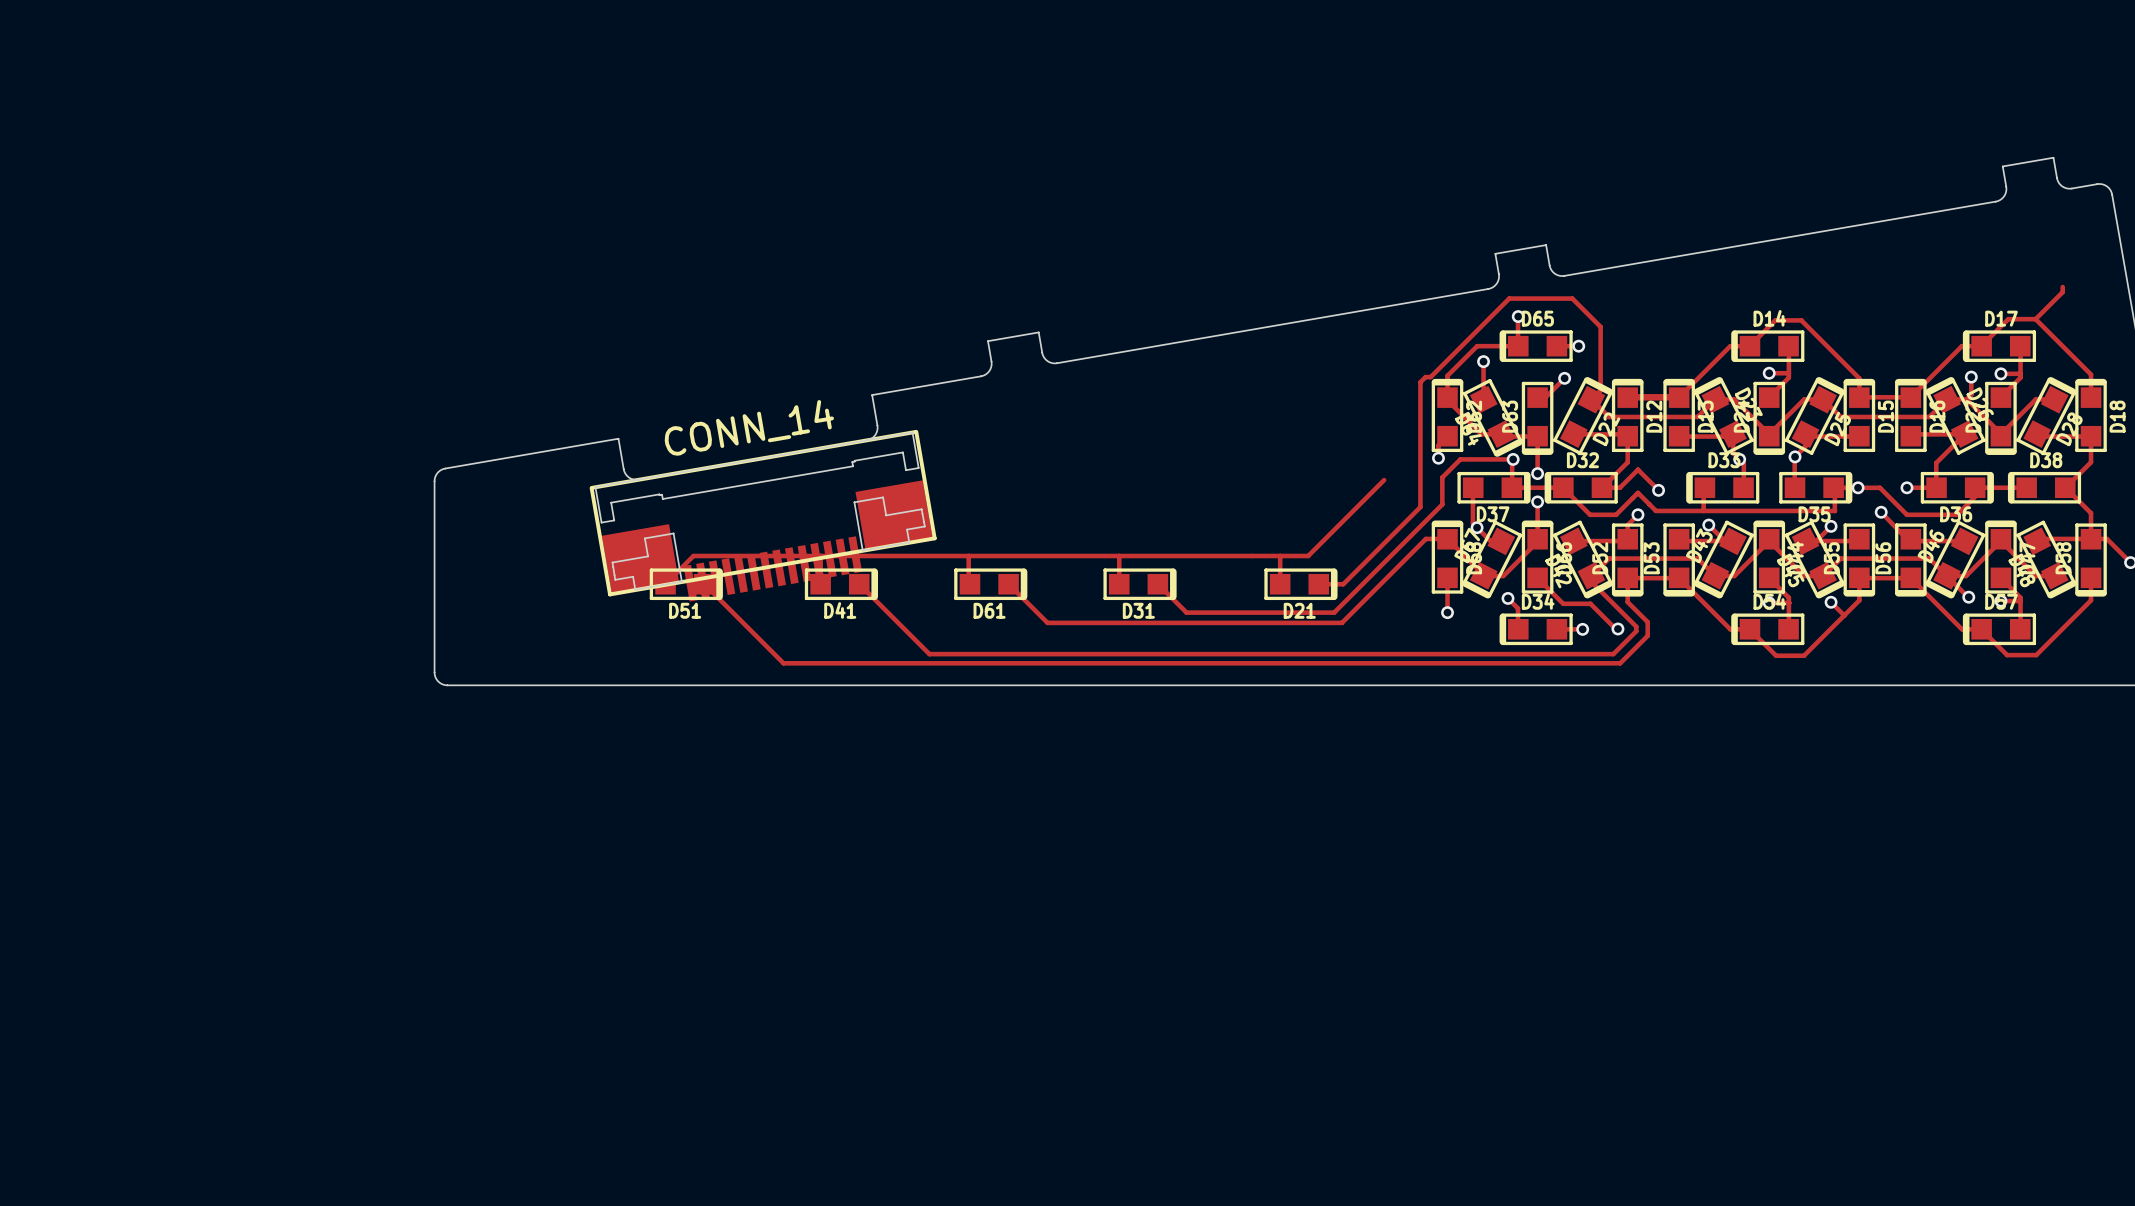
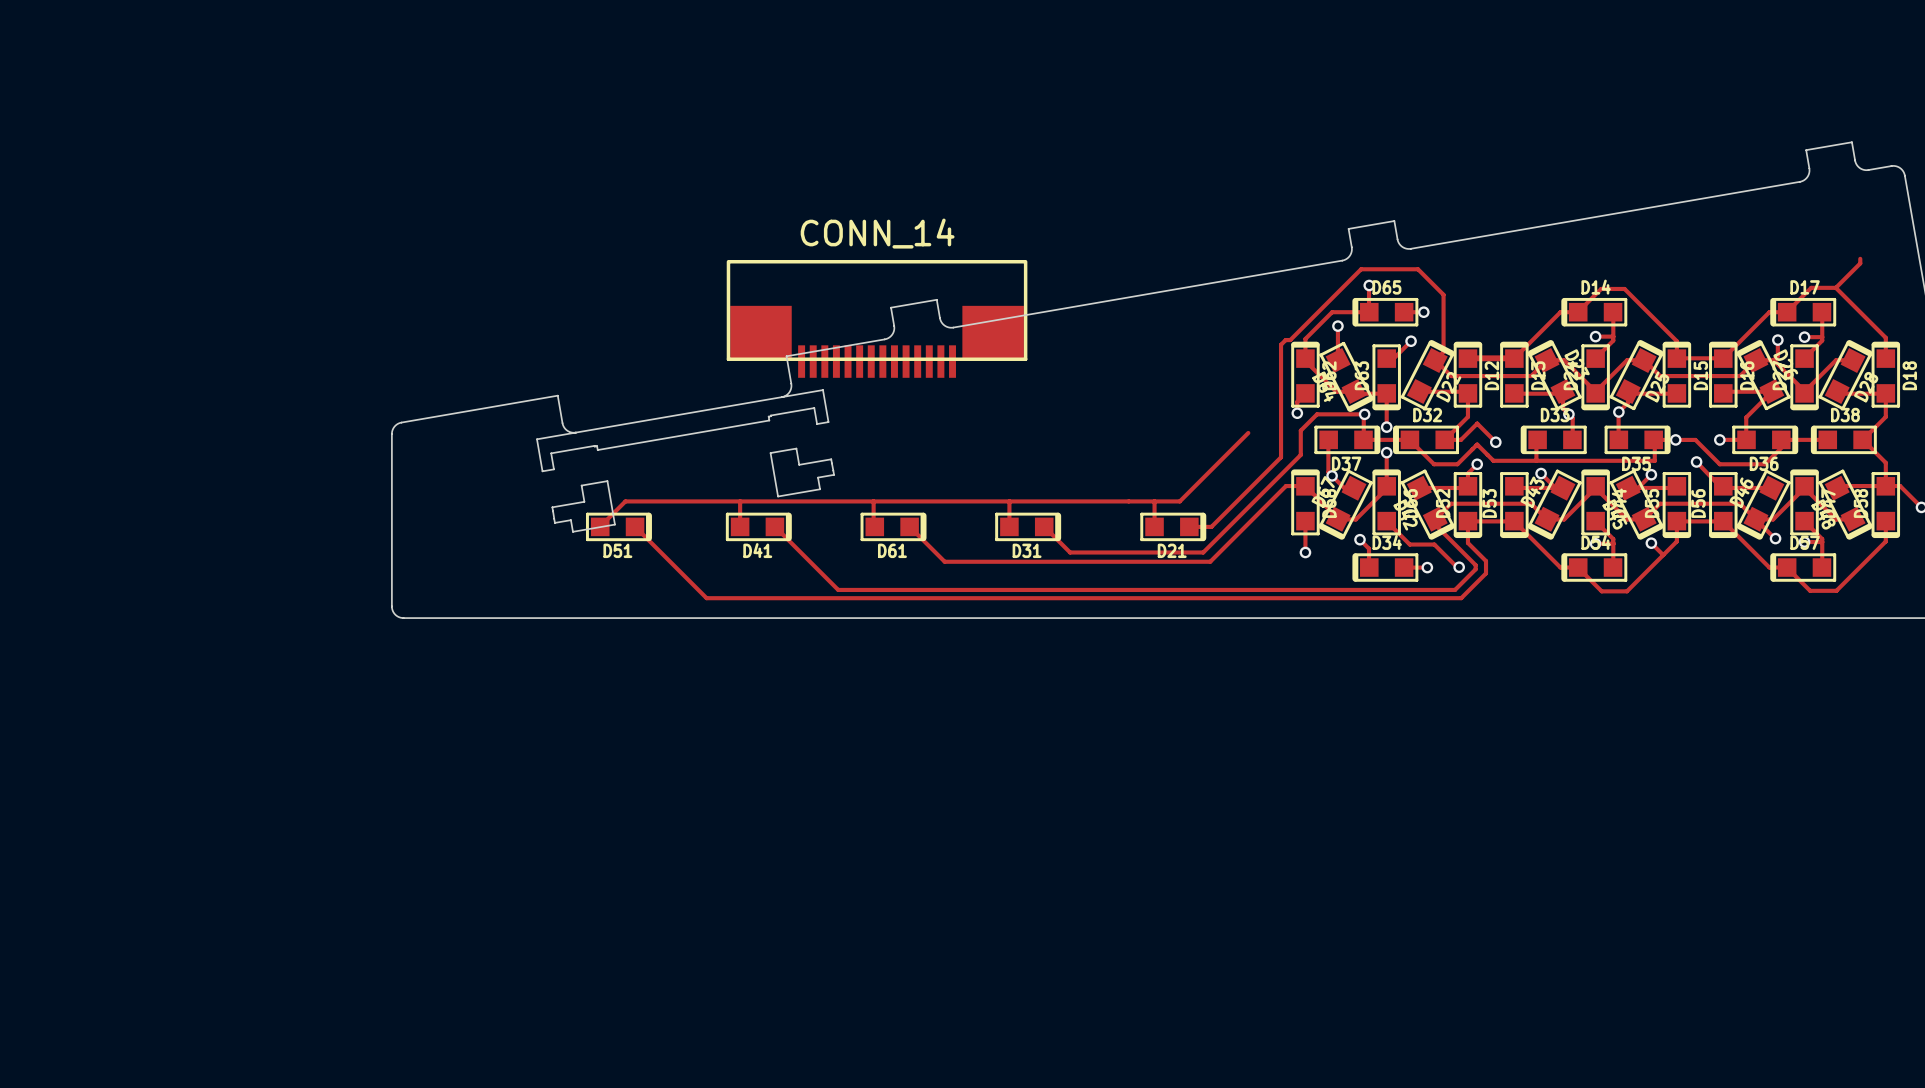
part: none -> CONN_14 (877, 318)
part: CONN_14 (763, 515) -> none

